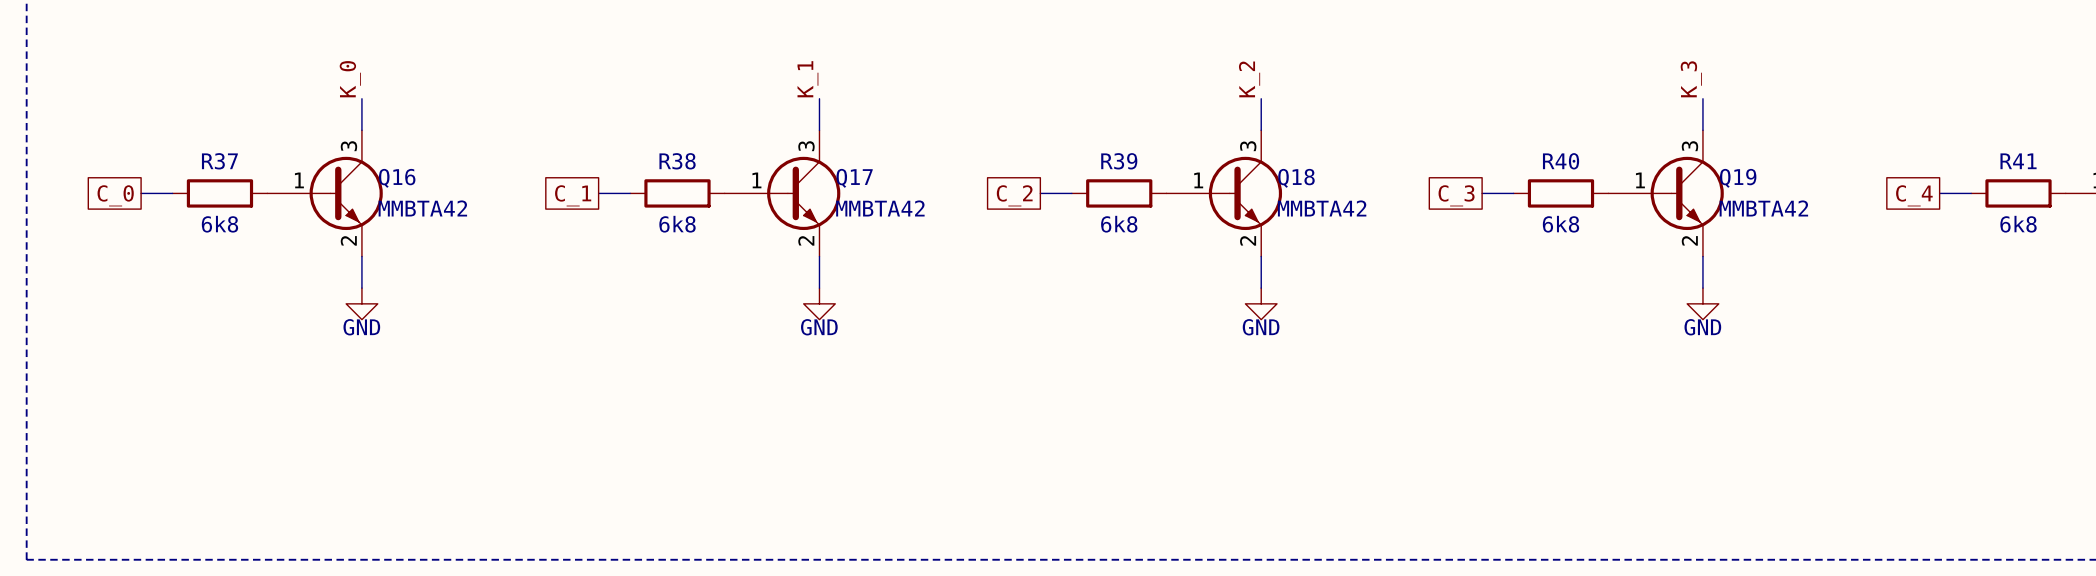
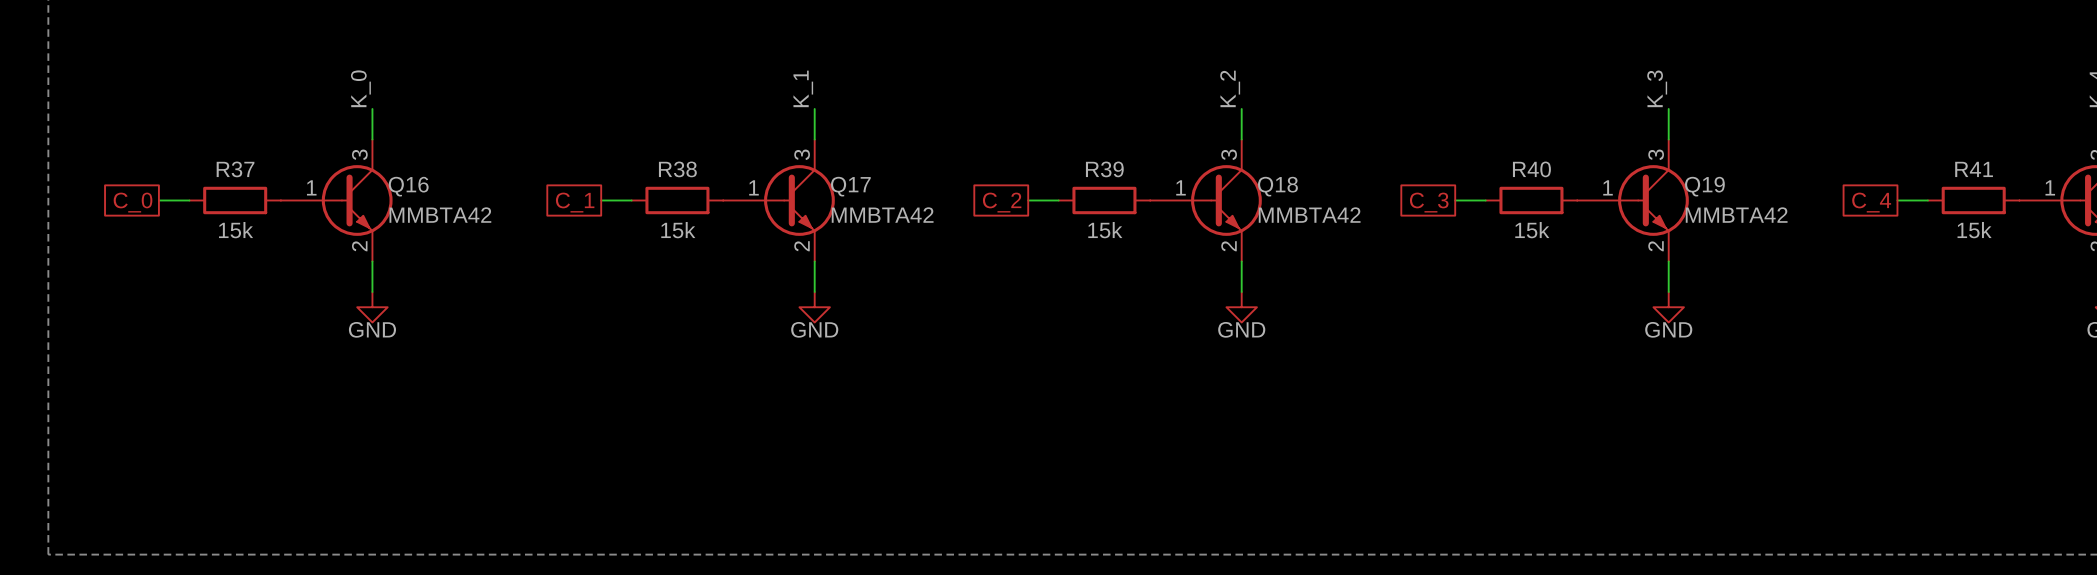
R37 value: 6k8 (219, 224) -> 15k (236, 230)
R38 value: 6k8 (677, 224) -> 15k (678, 230)
R39 value: 6k8 (1119, 224) -> 15k (1105, 230)
R40 value: 6k8 (1560, 224) -> 15k (1532, 230)
R41 value: 6k8 (2018, 224) -> 15k (1974, 230)

